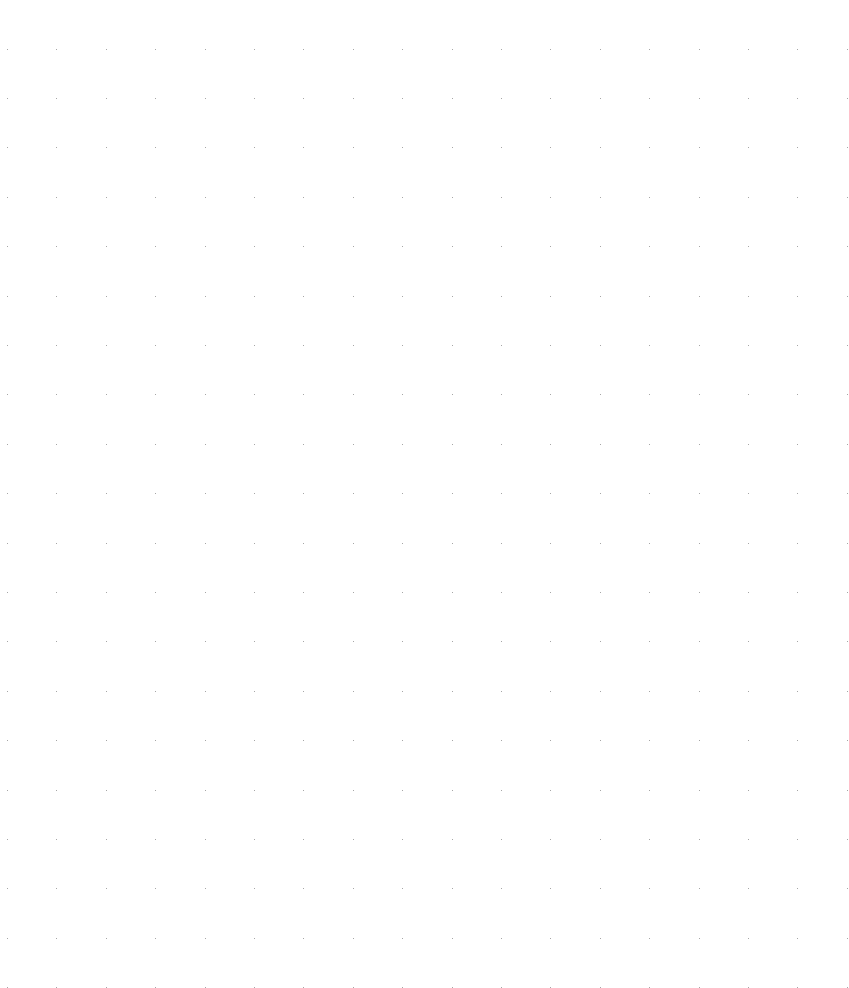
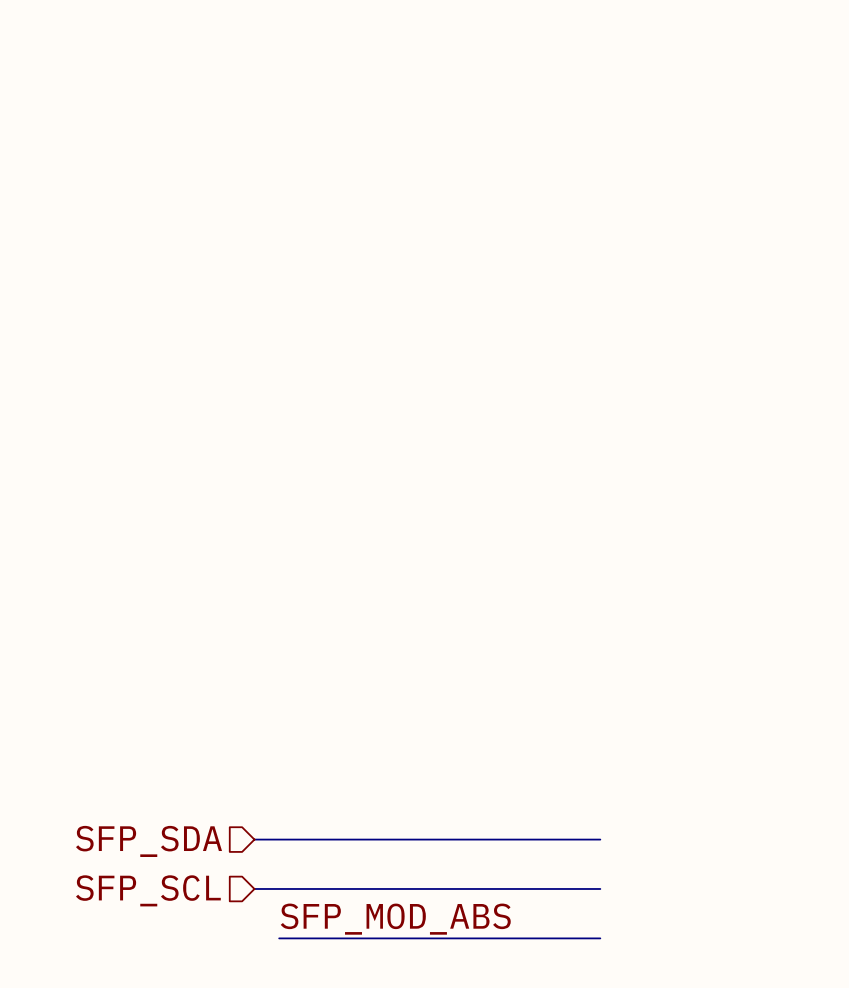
hierarchical label: none -> SFP_SDA (149, 841)
wire: none -> (254, 839) (600, 839)
wire: none -> (254, 888) (600, 888)
hierarchical label: none -> SFP_SCL (148, 890)
label: none -> SFP_MOD_ABS (395, 919)
wire: none -> (279, 938) (600, 938)

